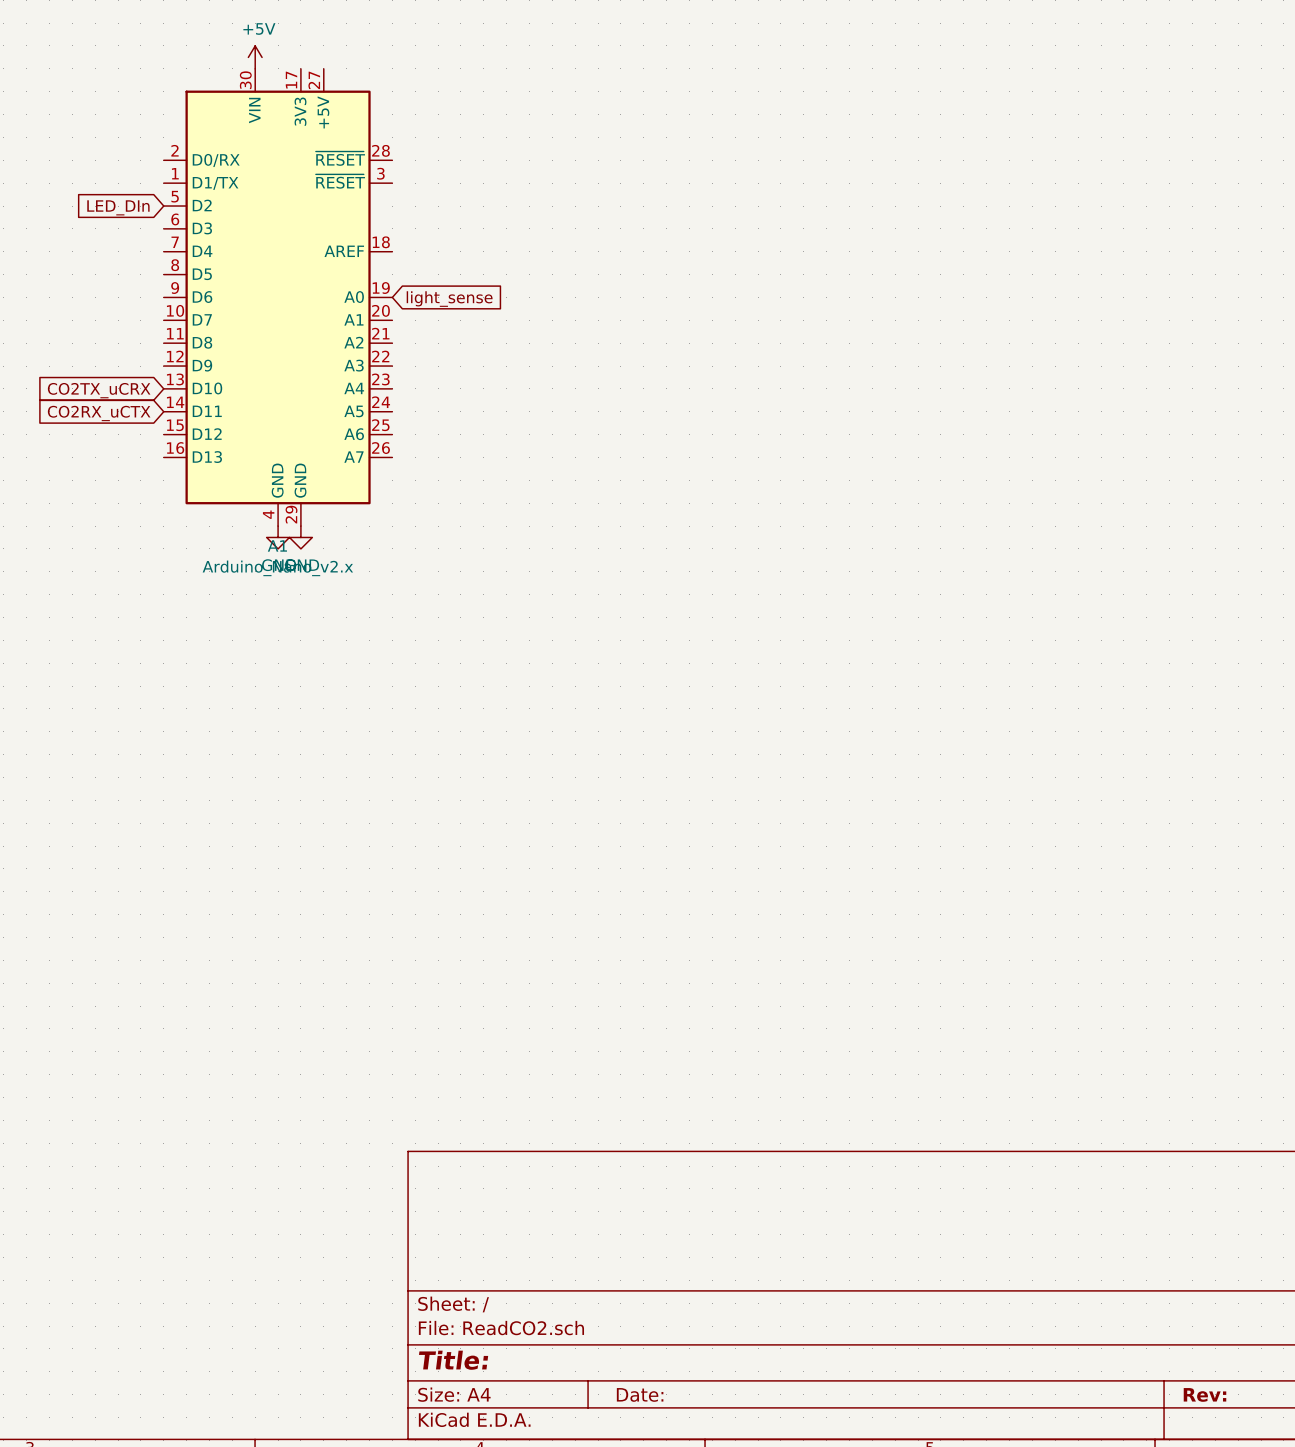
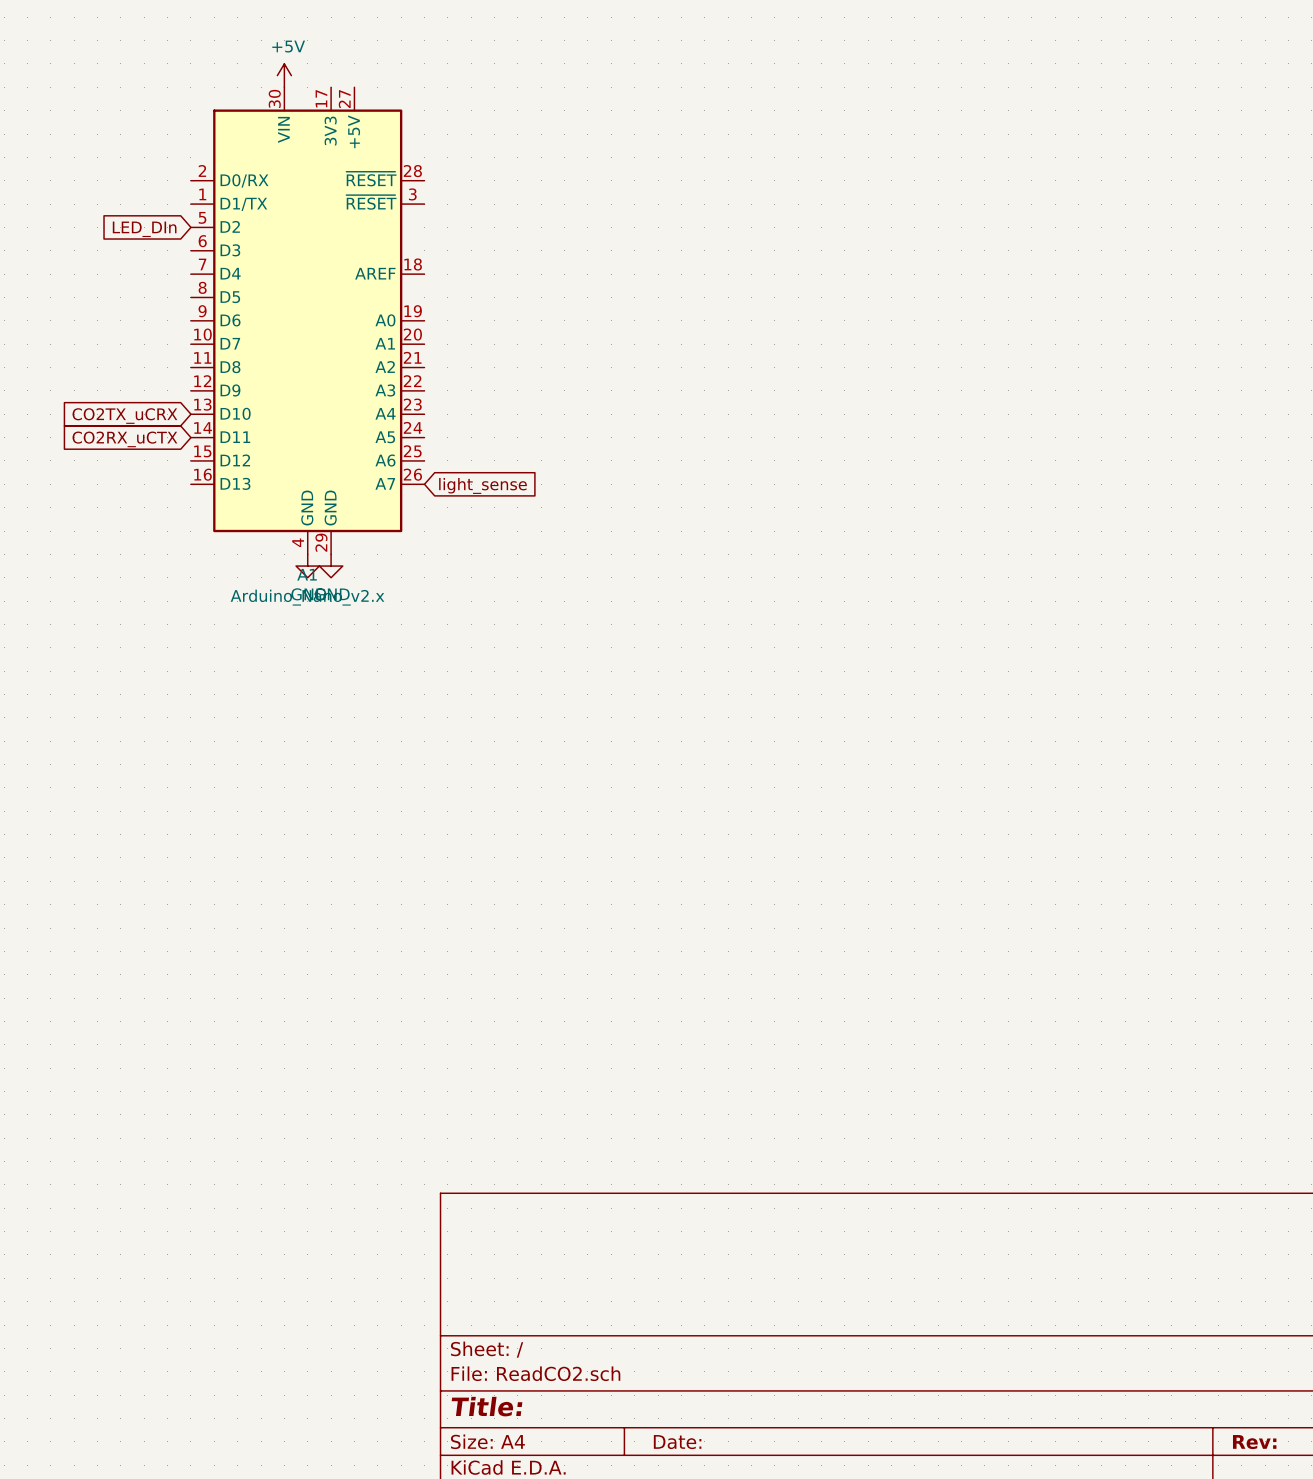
global label position: light_sense (449, 299) -> light_sense (482, 485)

